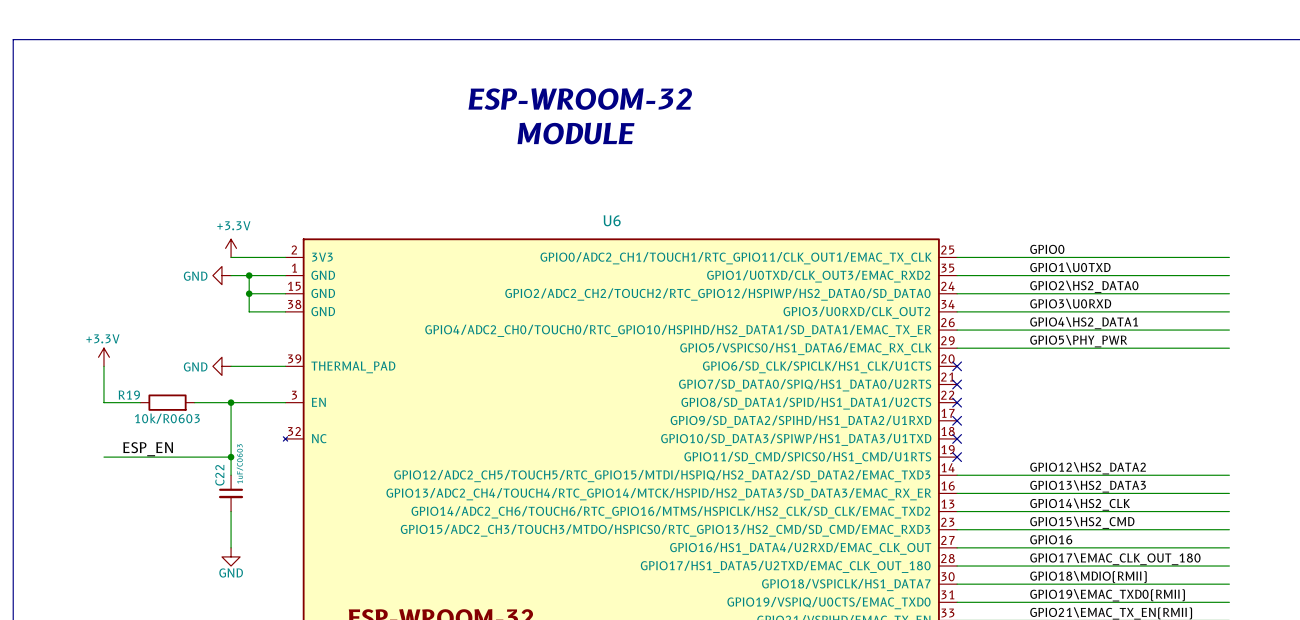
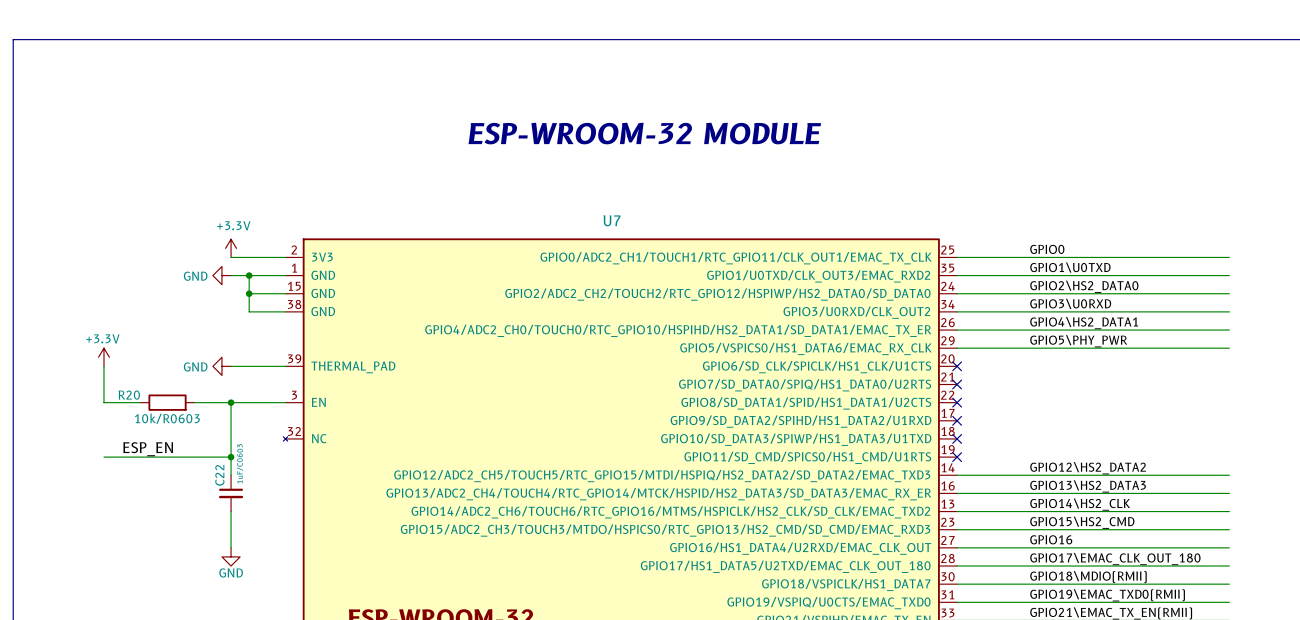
text: ESP-WROOM-32 (580, 99) -> none
text: MODULE (575, 133) -> ESP-WROOM-32 MODULE (644, 133)
U6 name: U6 (612, 220) -> U7 (612, 220)
R19 name: R19 (129, 395) -> R20 (129, 395)

